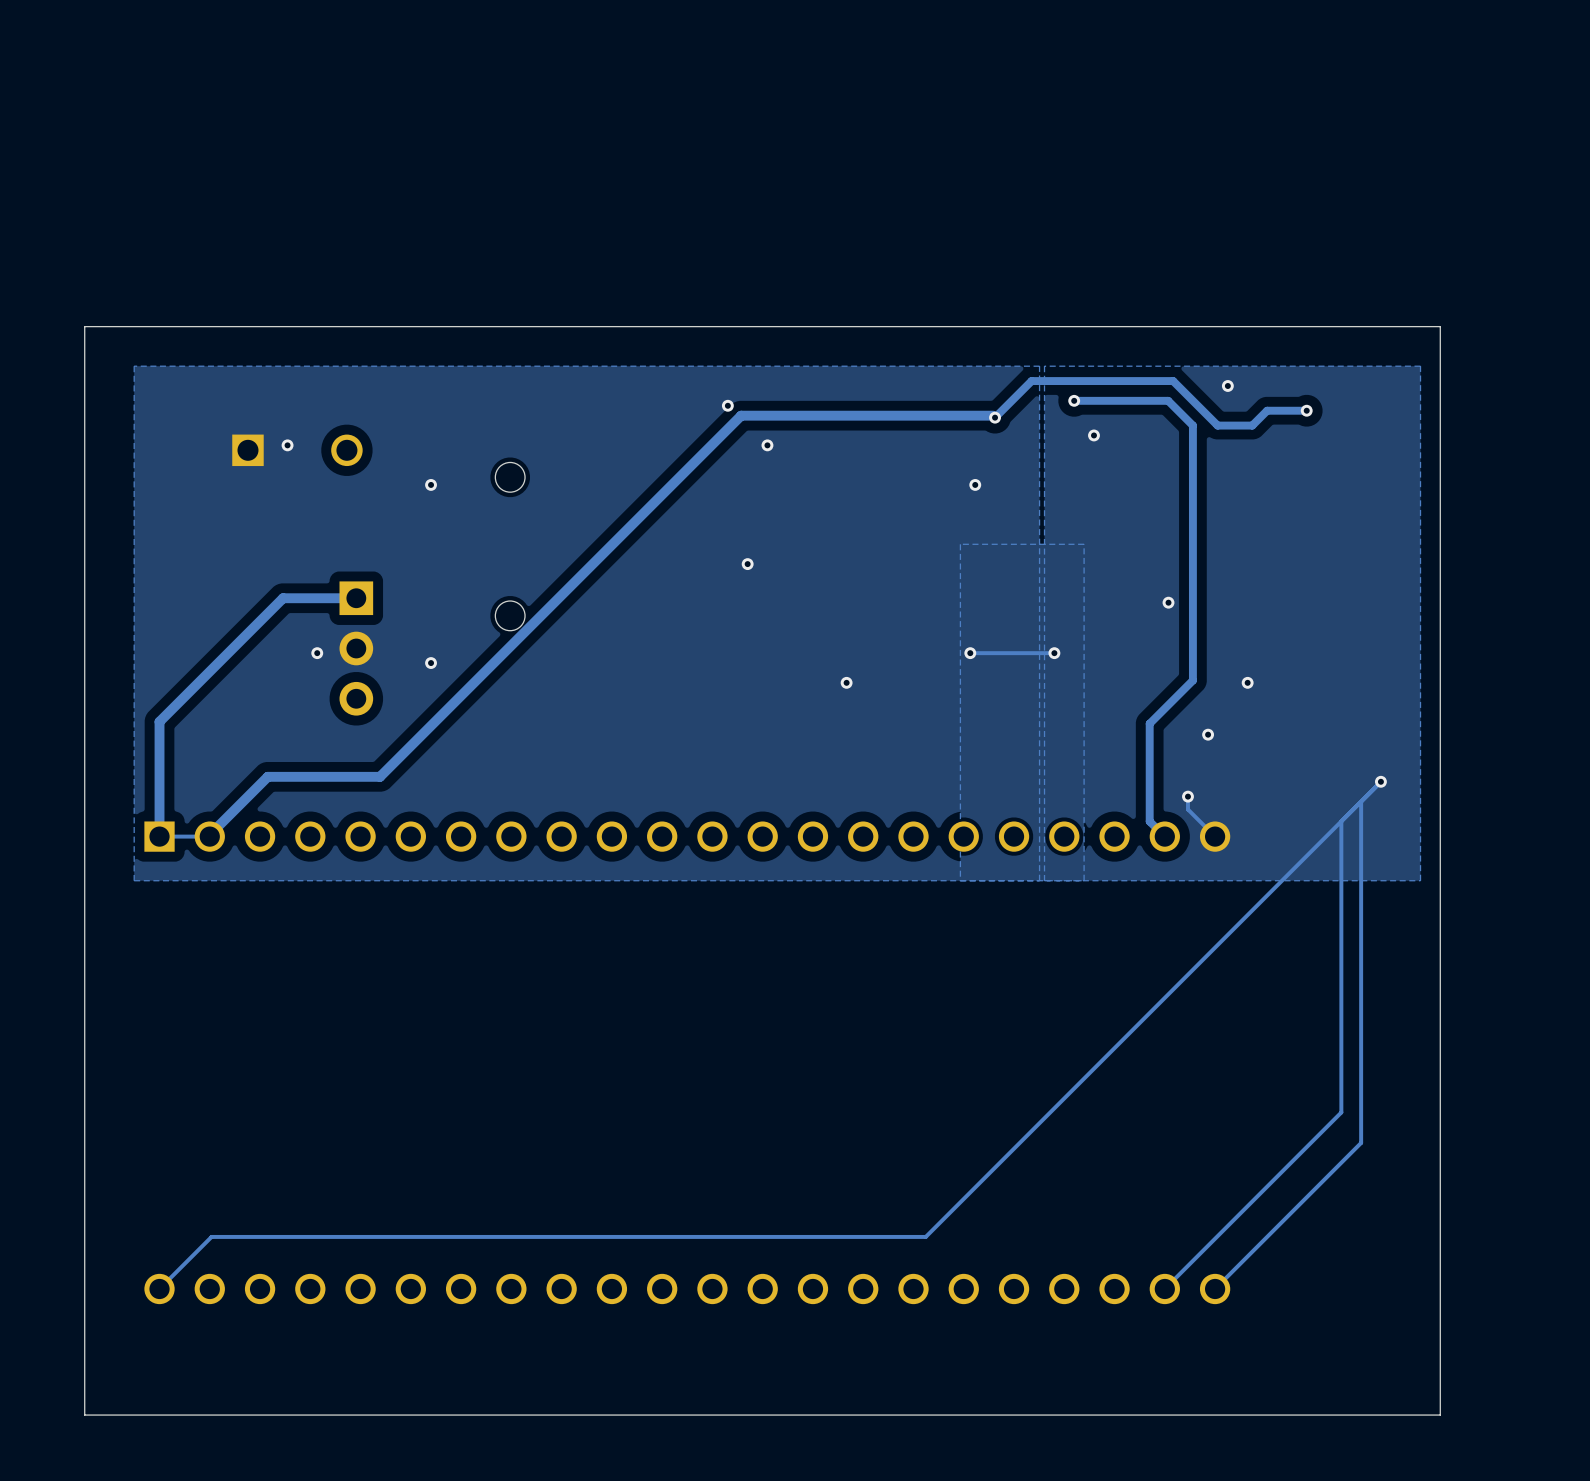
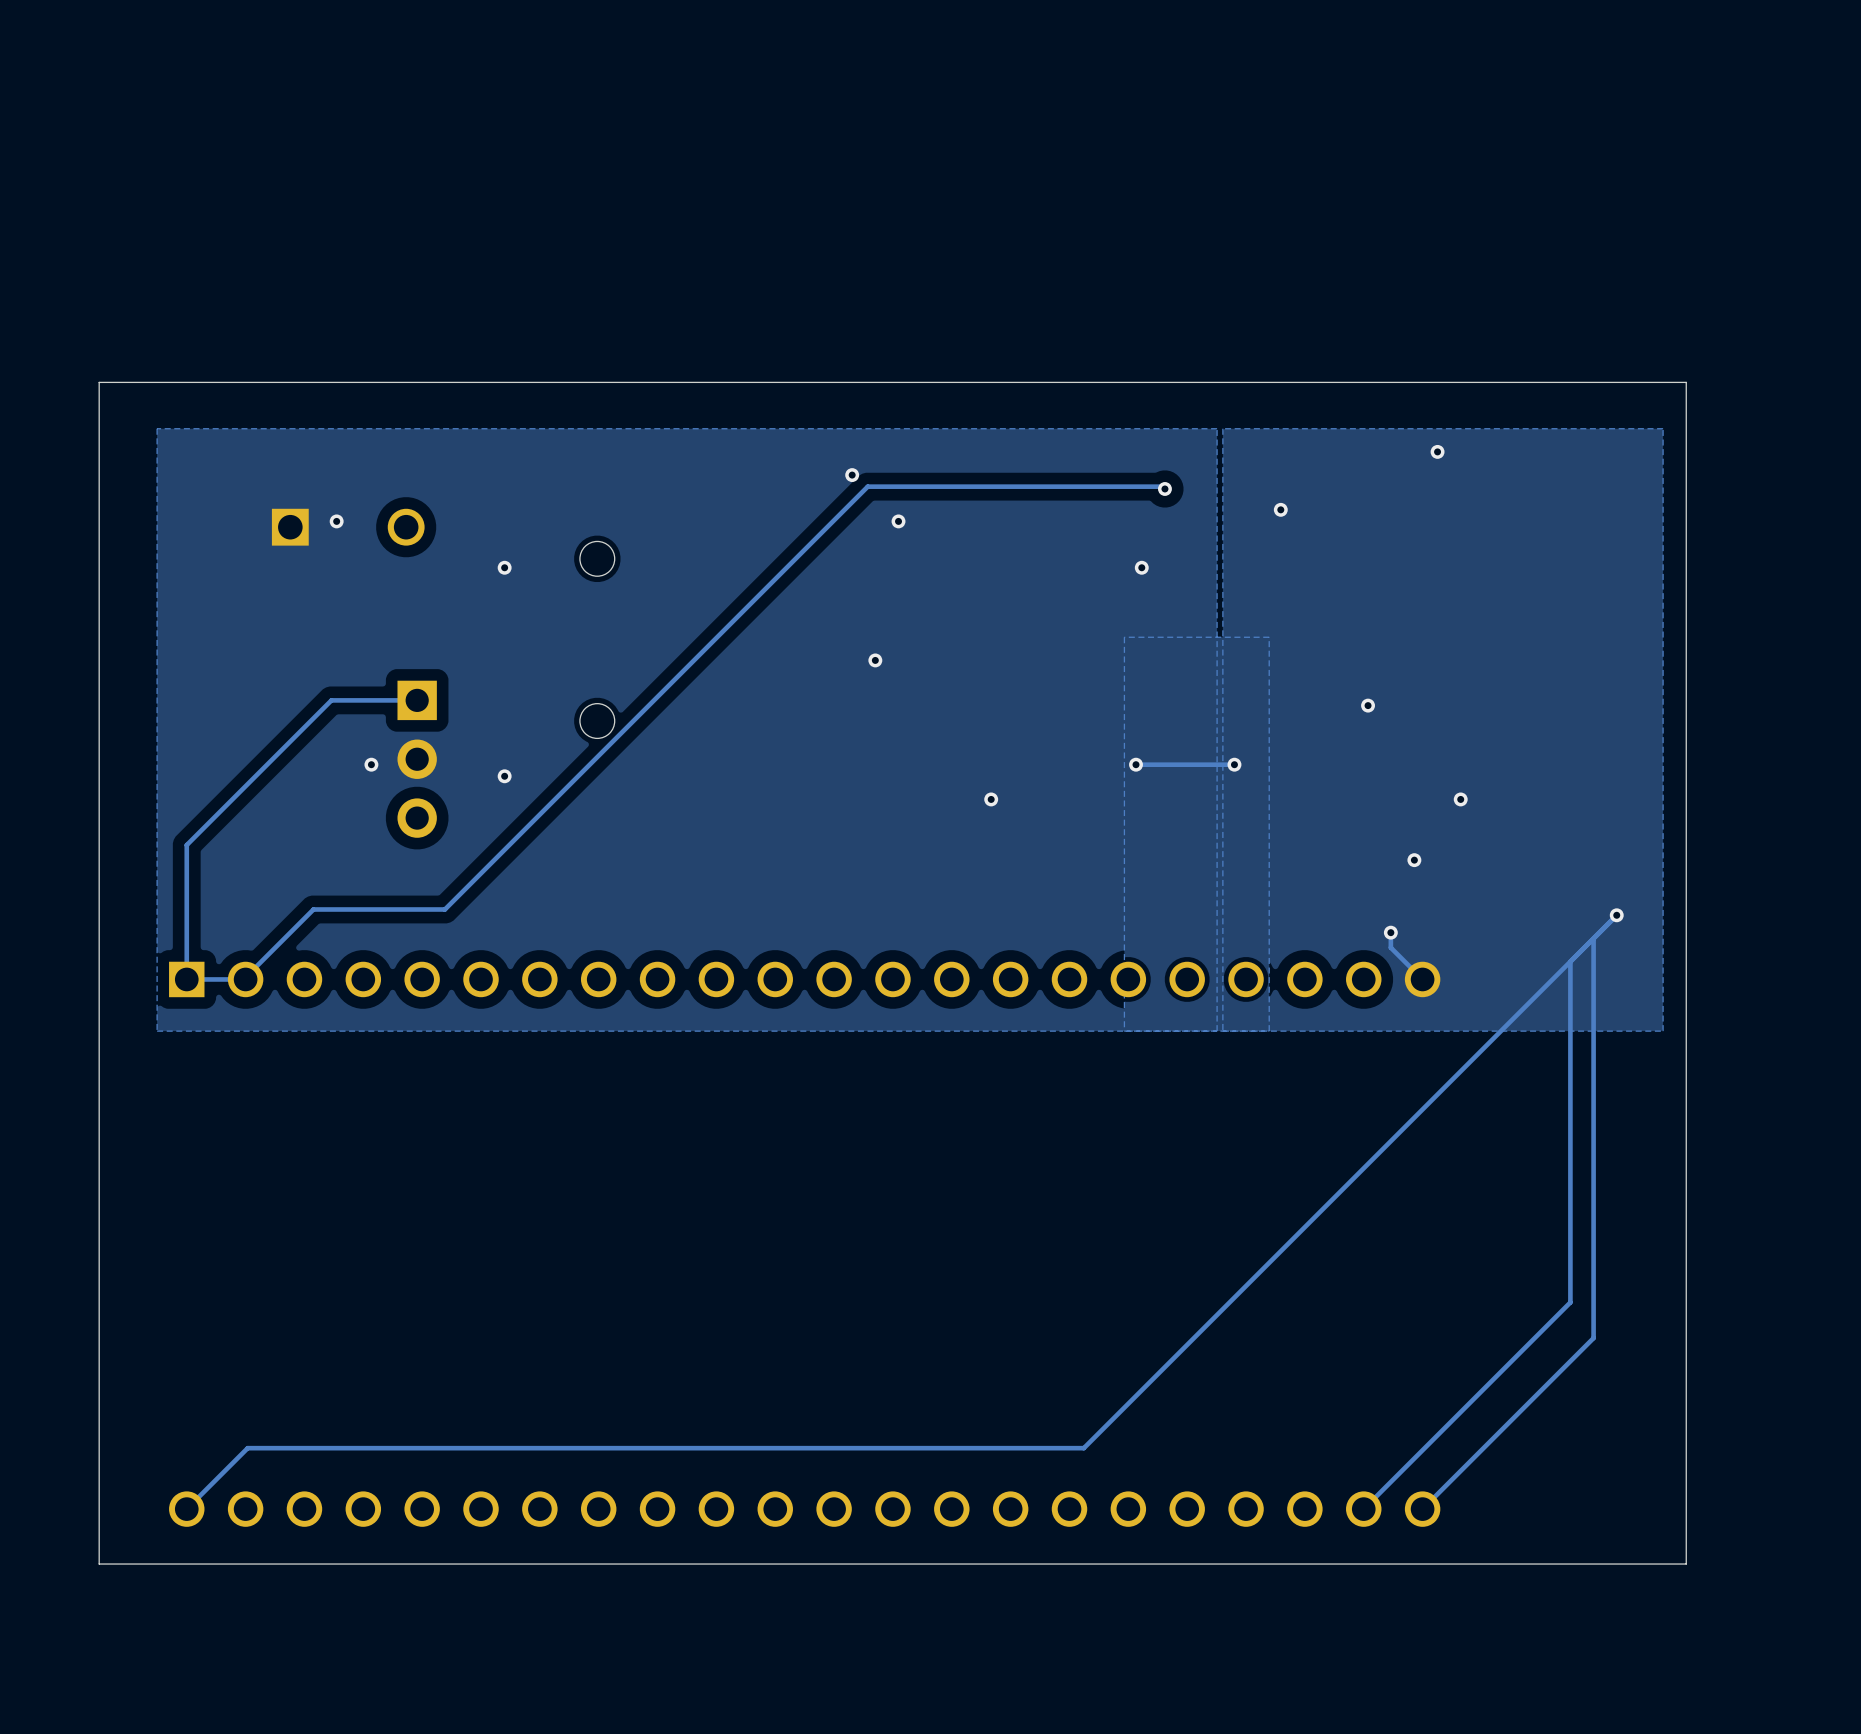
track: (1074, 400) (1168, 400) (1192, 425) (1192, 680) (1149, 723) (1149, 821) (1164, 836) -> none
via: (1074, 400) -> none
track: (1306, 410) (1267, 410) (1252, 425) (1217, 425) (1173, 381) (1031, 381) (995, 417) -> none
via: (1306, 410) -> none
track width: thick (993, 415) (741, 415) (380, 776) (267, 776) (209, 834) -> thin (1162, 486) (867, 486) (444, 909) (313, 909) (245, 977)
track width: thick (356, 598) (283, 598) (159, 721) (159, 836) -> thin (417, 700) (331, 700) (186, 845) (186, 979)
board edge: (1440, 1335) (1440, 1415) (84, 1415) (84, 1335) -> (1686, 1564) (99, 1564)

